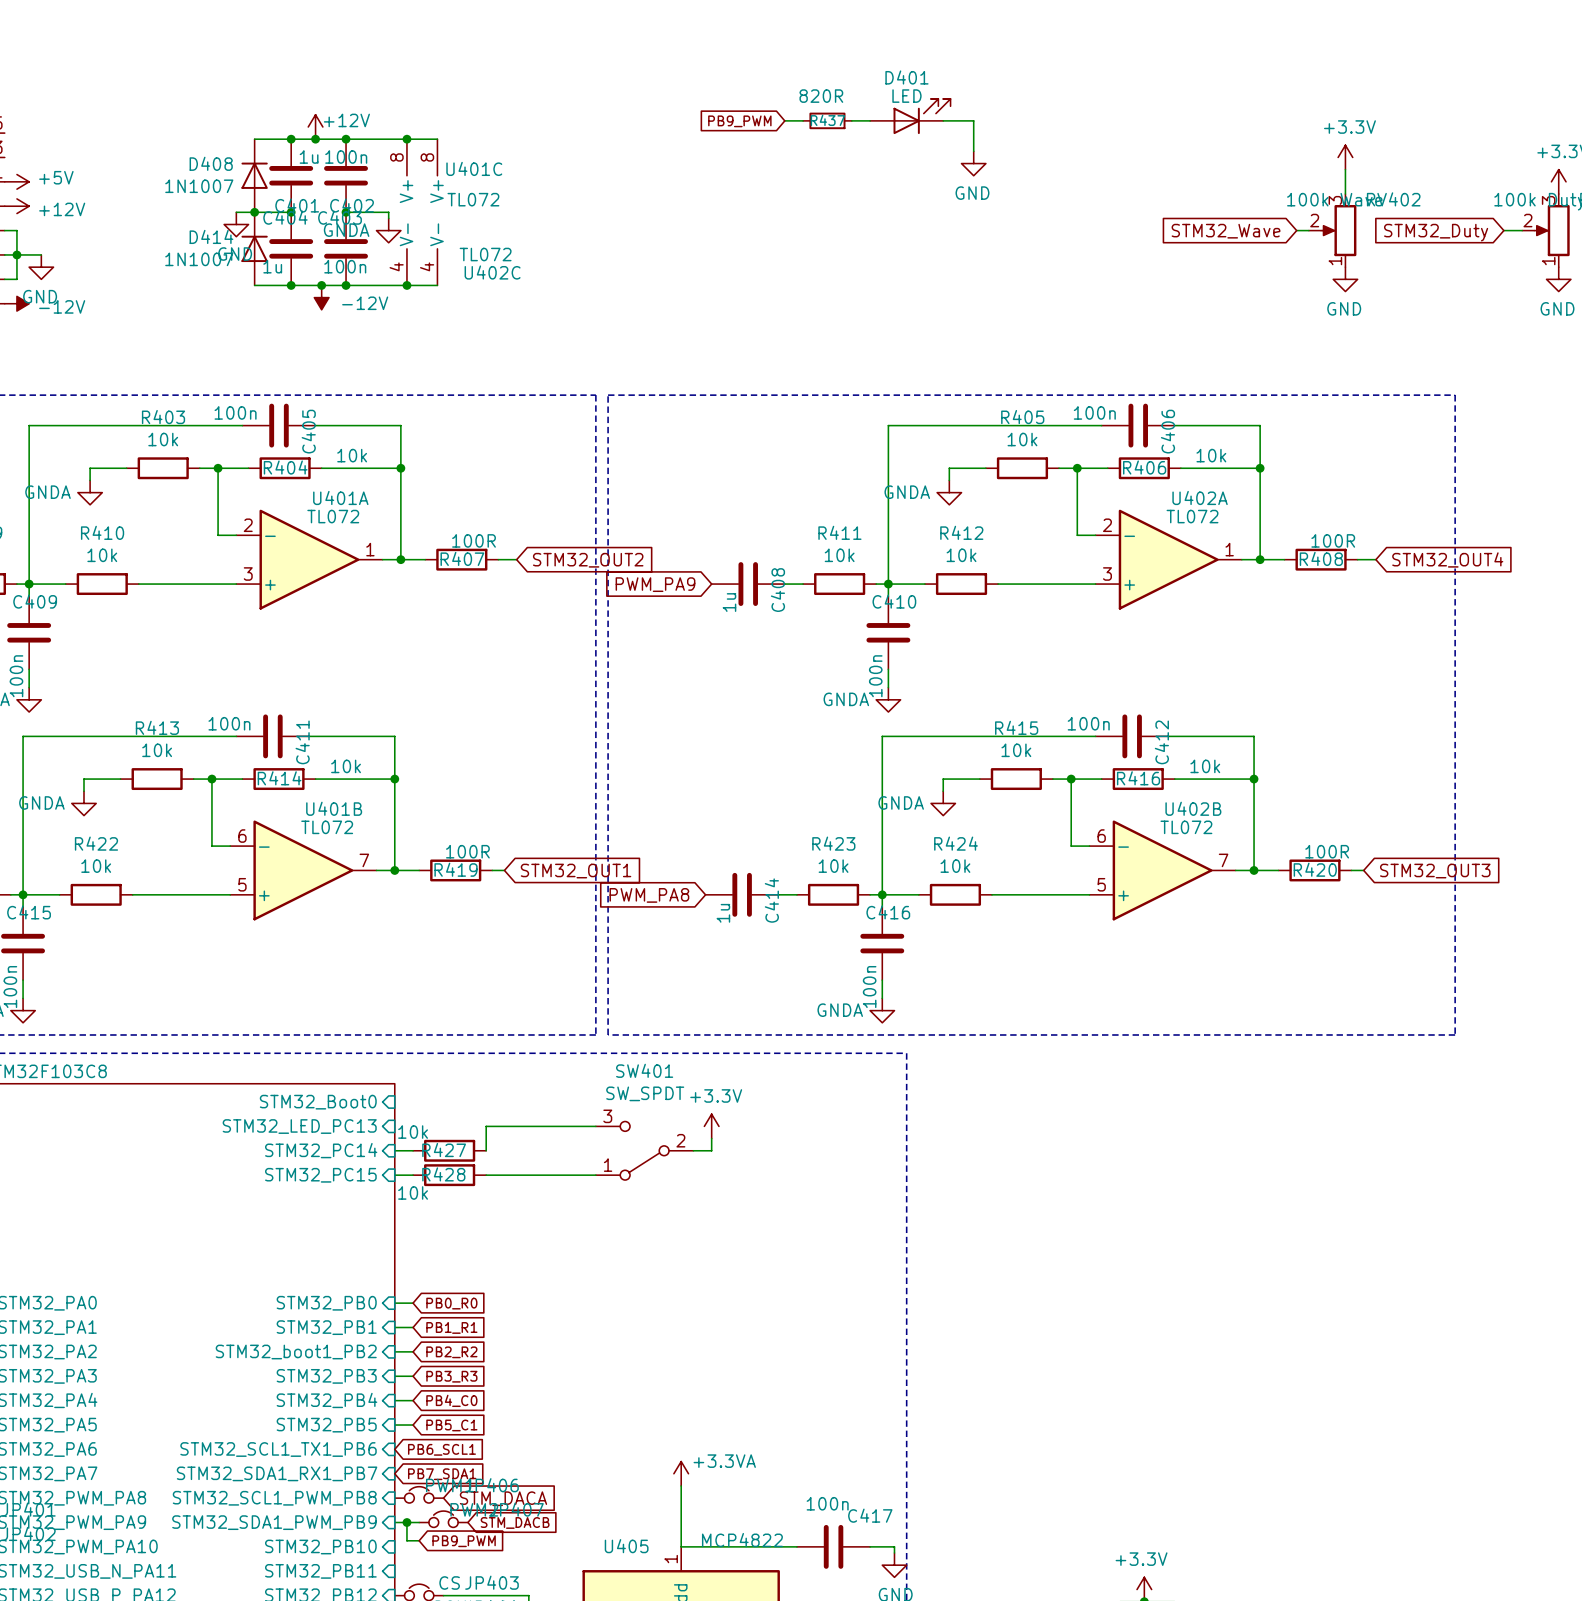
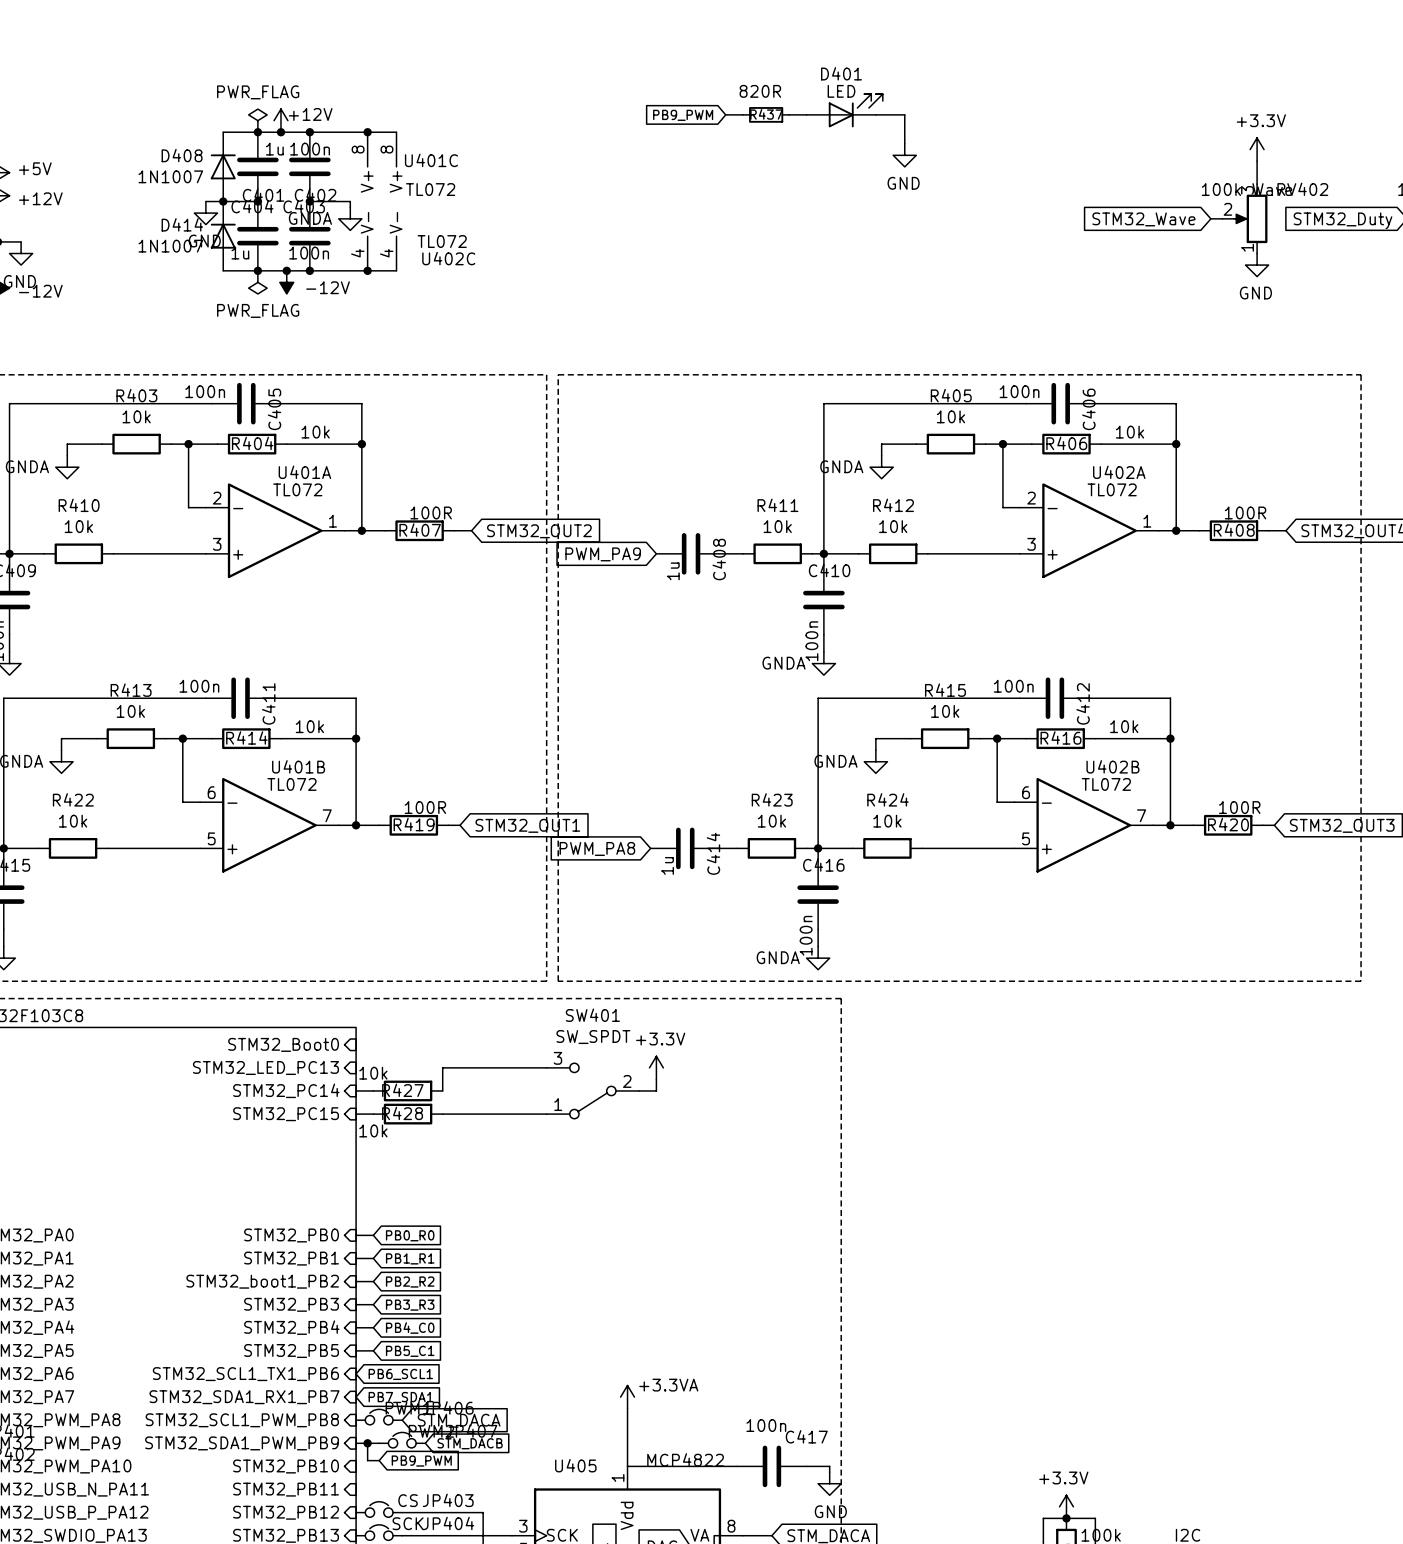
power symbol: none -> PWR_FLAG (257, 120)
power symbol: none -> PWR_FLAG (257, 282)

